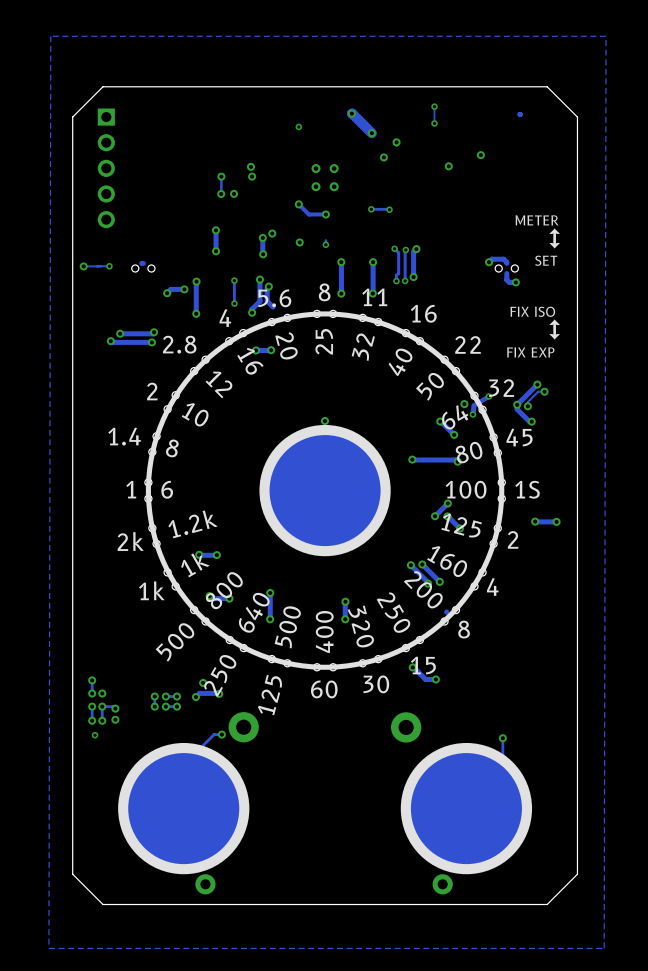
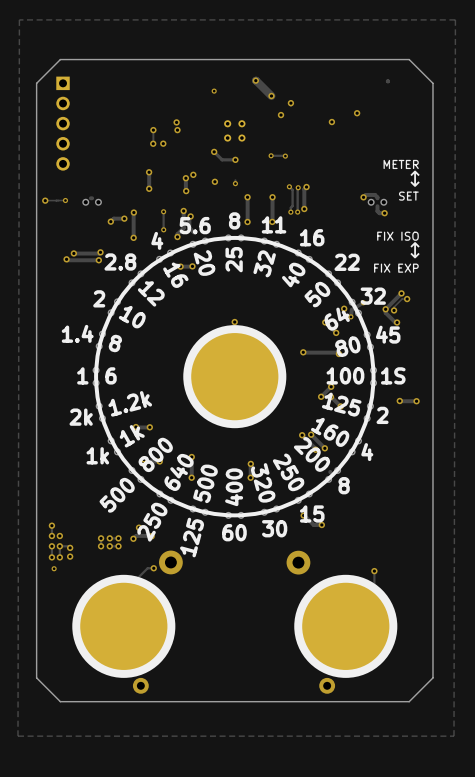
track: (434, 106) (434, 123) -> none
via: (434, 106) -> none
via: (434, 123) -> none

